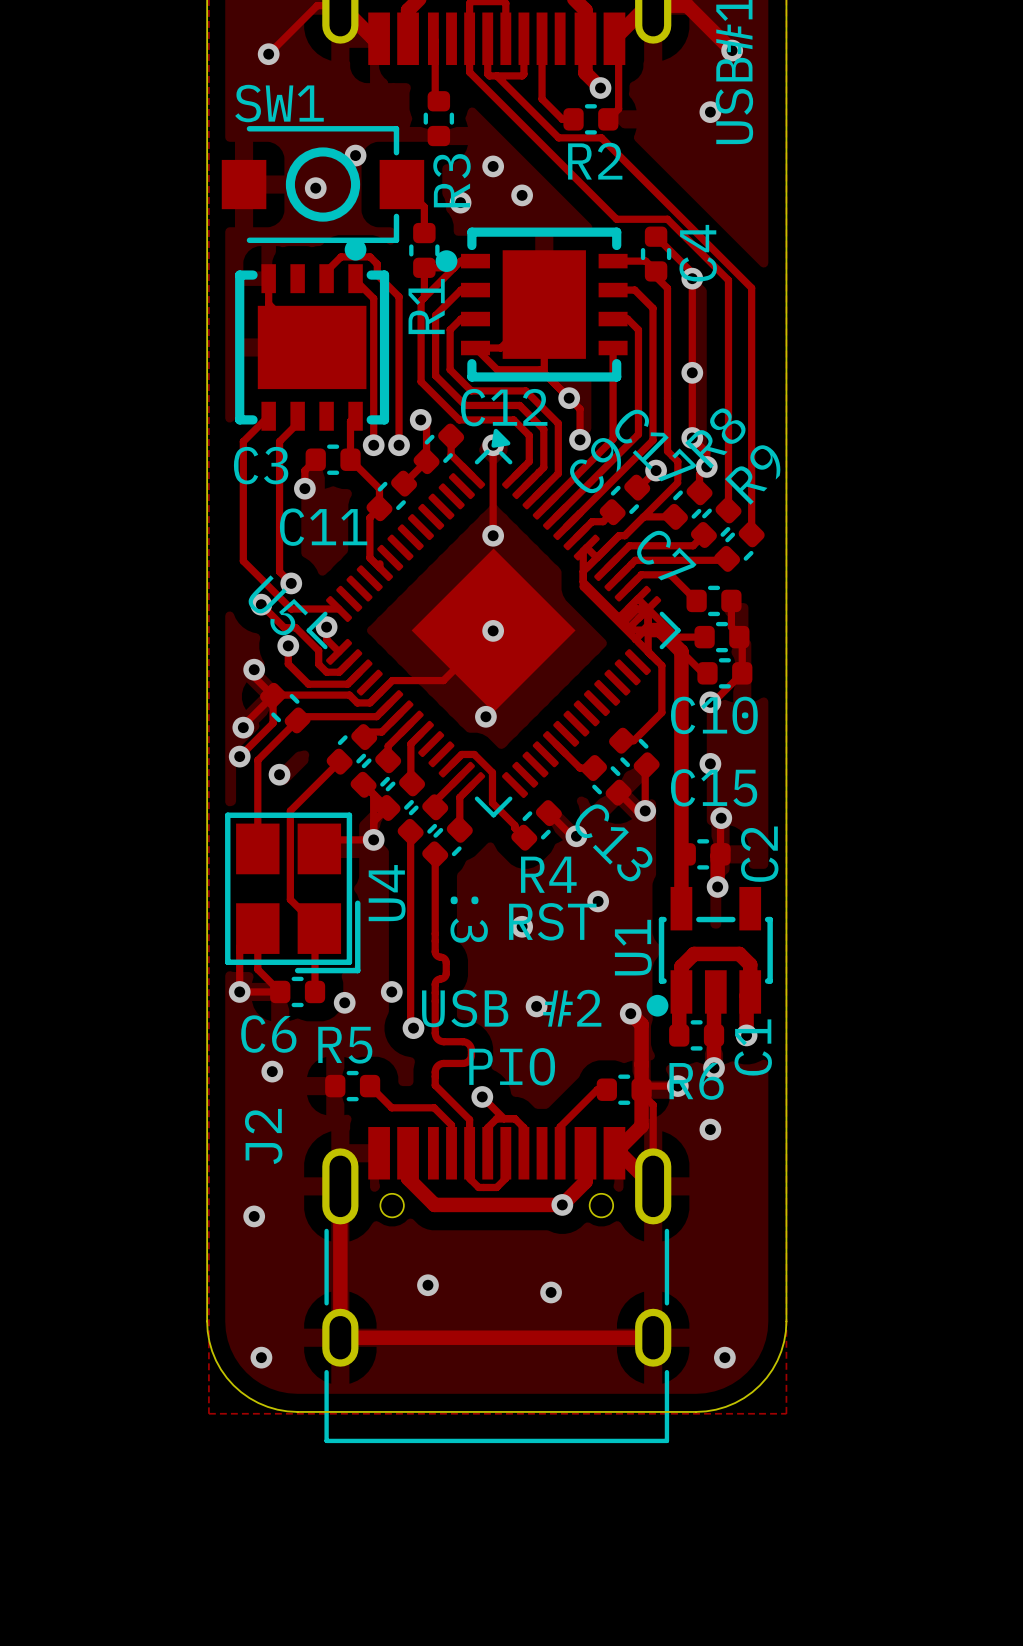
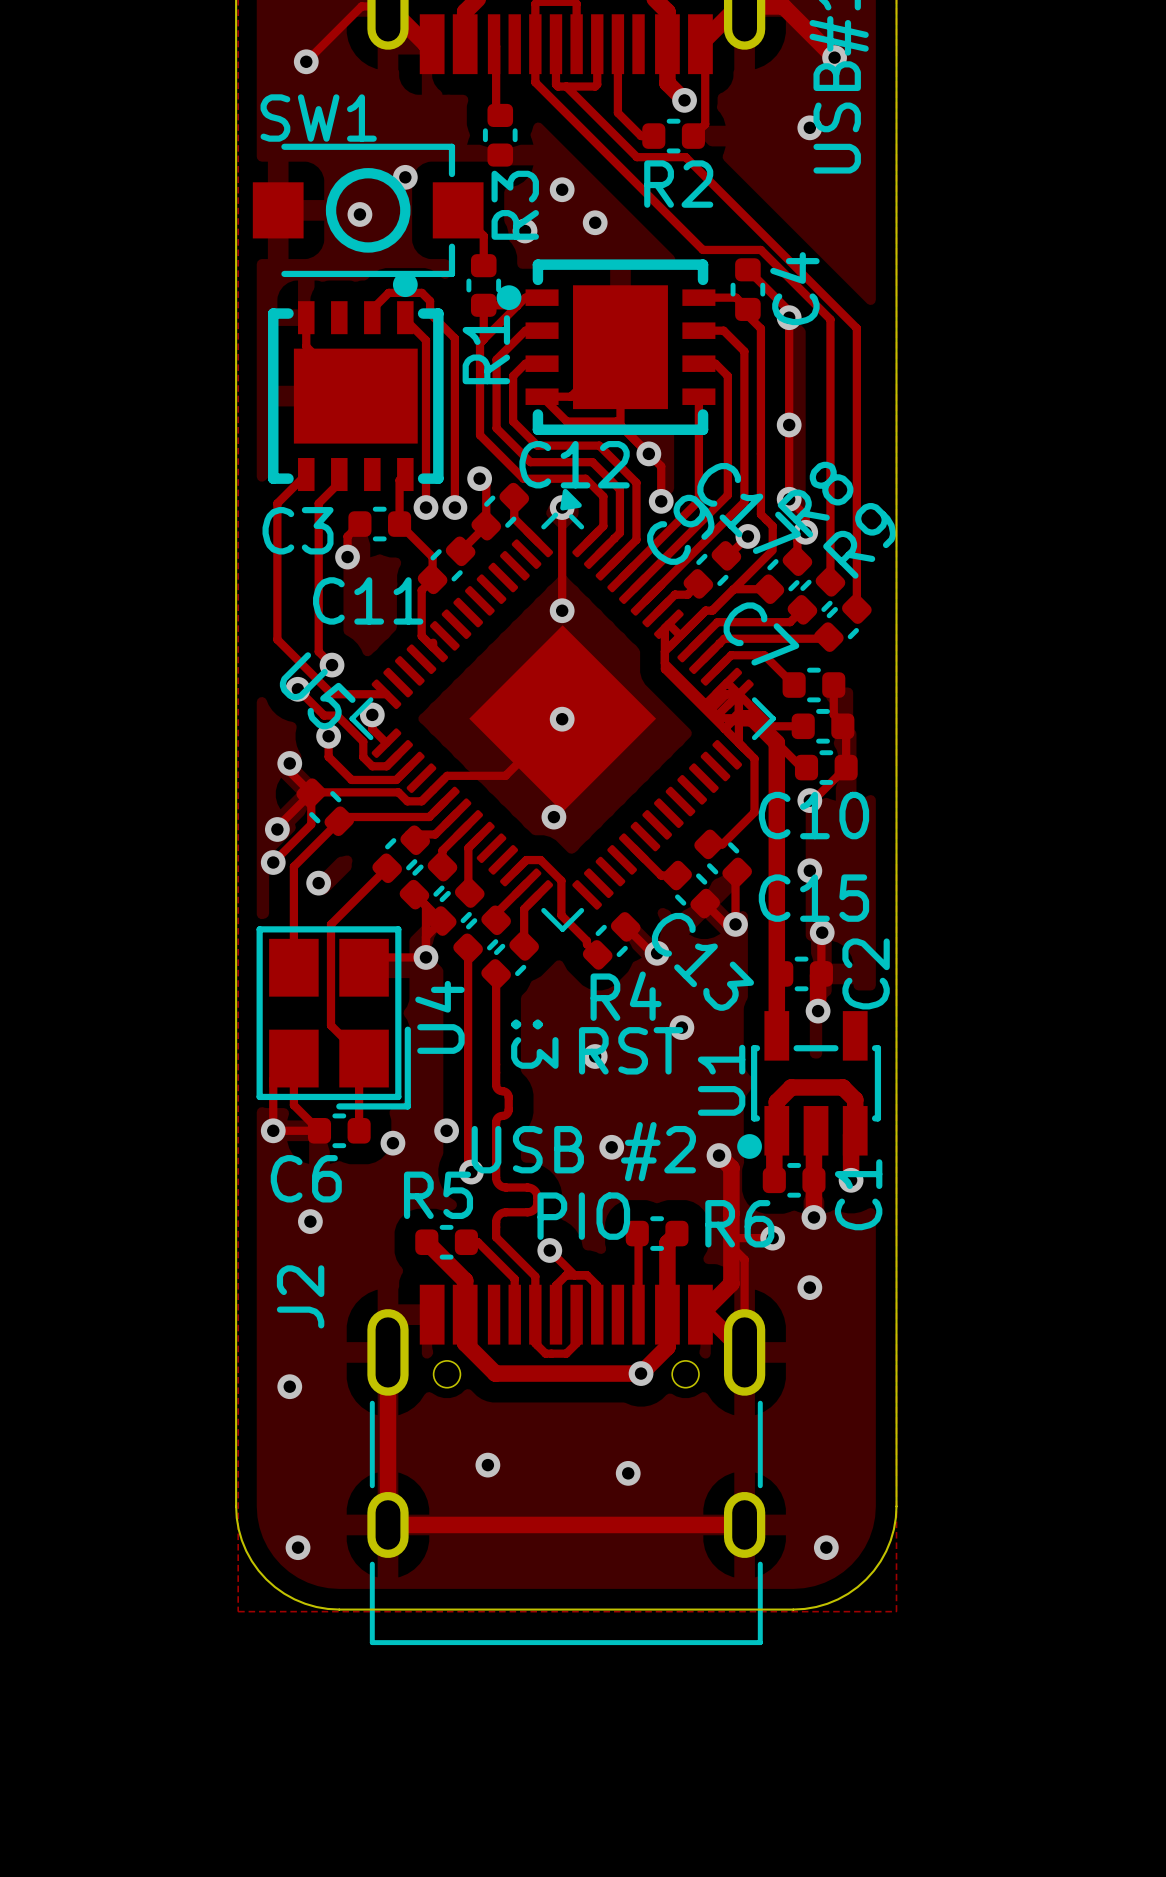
track: none -> (676, 1233) (667, 1243) (667, 1314)
R5 position: (352, 1086) -> (446, 1242)
track: (370, 1086) (391, 1107) (434, 1107) (451, 1125) -> (466, 1242) (477, 1242) (514, 1278) (514, 1282)
track: none -> (426, 1242) (465, 1280) (465, 1314)
track: (606, 1089) (597, 1089) (560, 1126) -> (637, 1233) (638, 1284)
R6 position: (624, 1089) -> (657, 1233)

